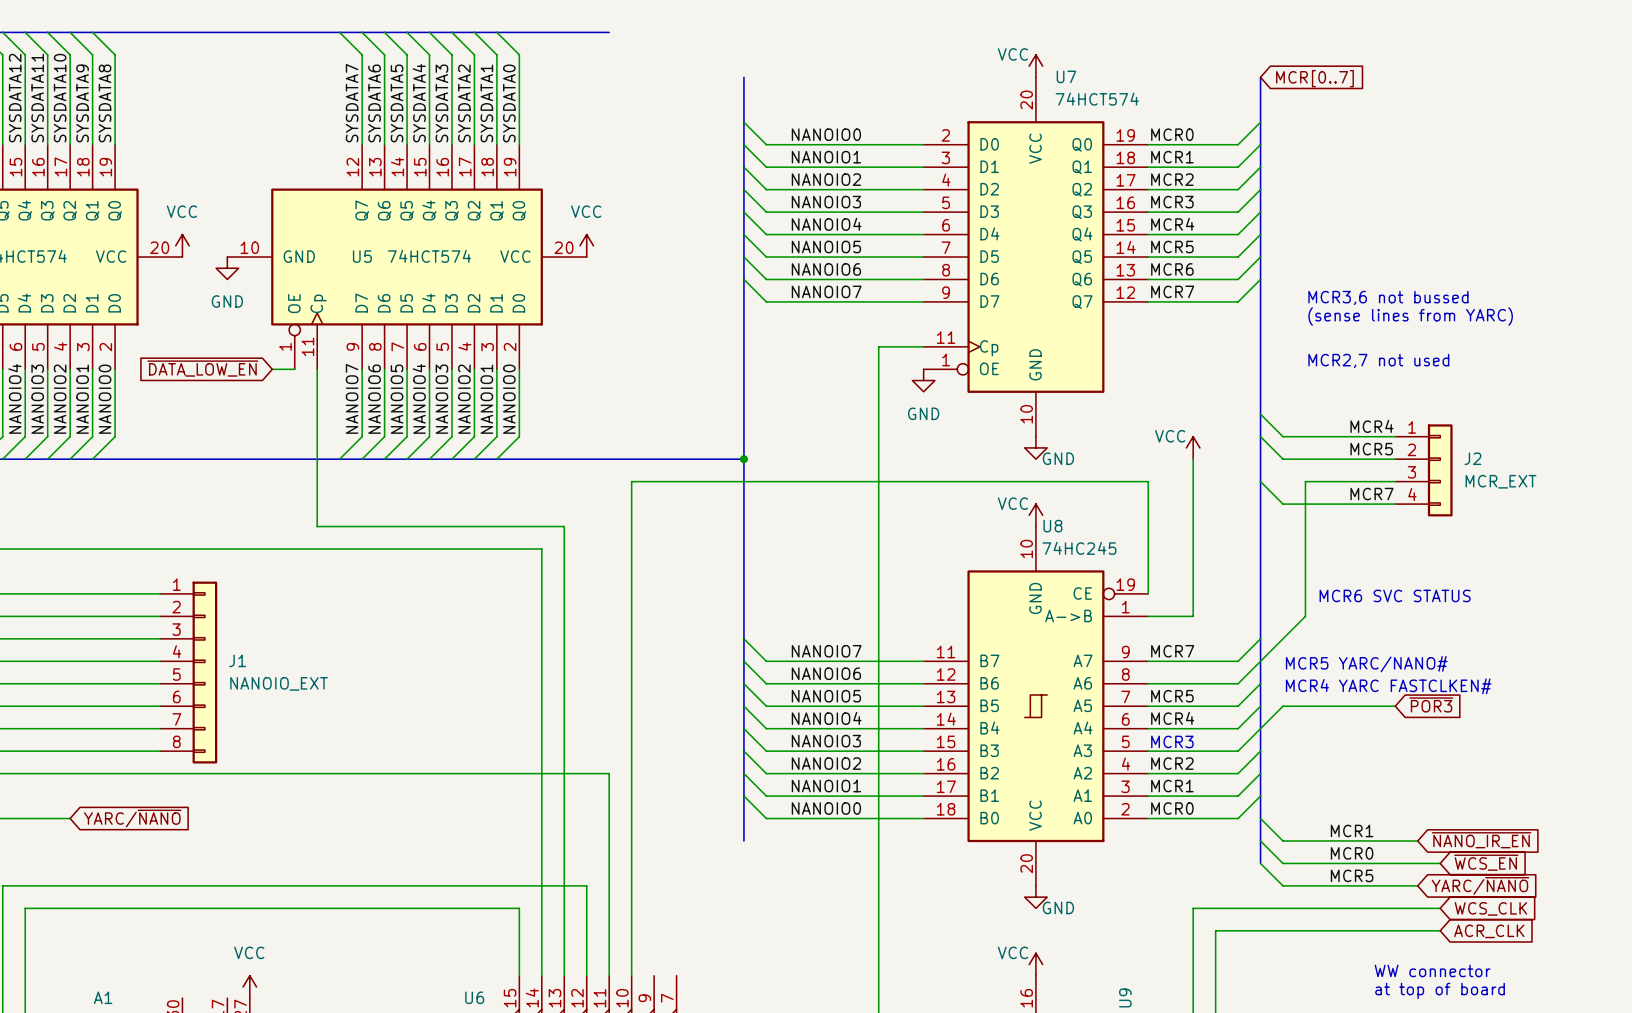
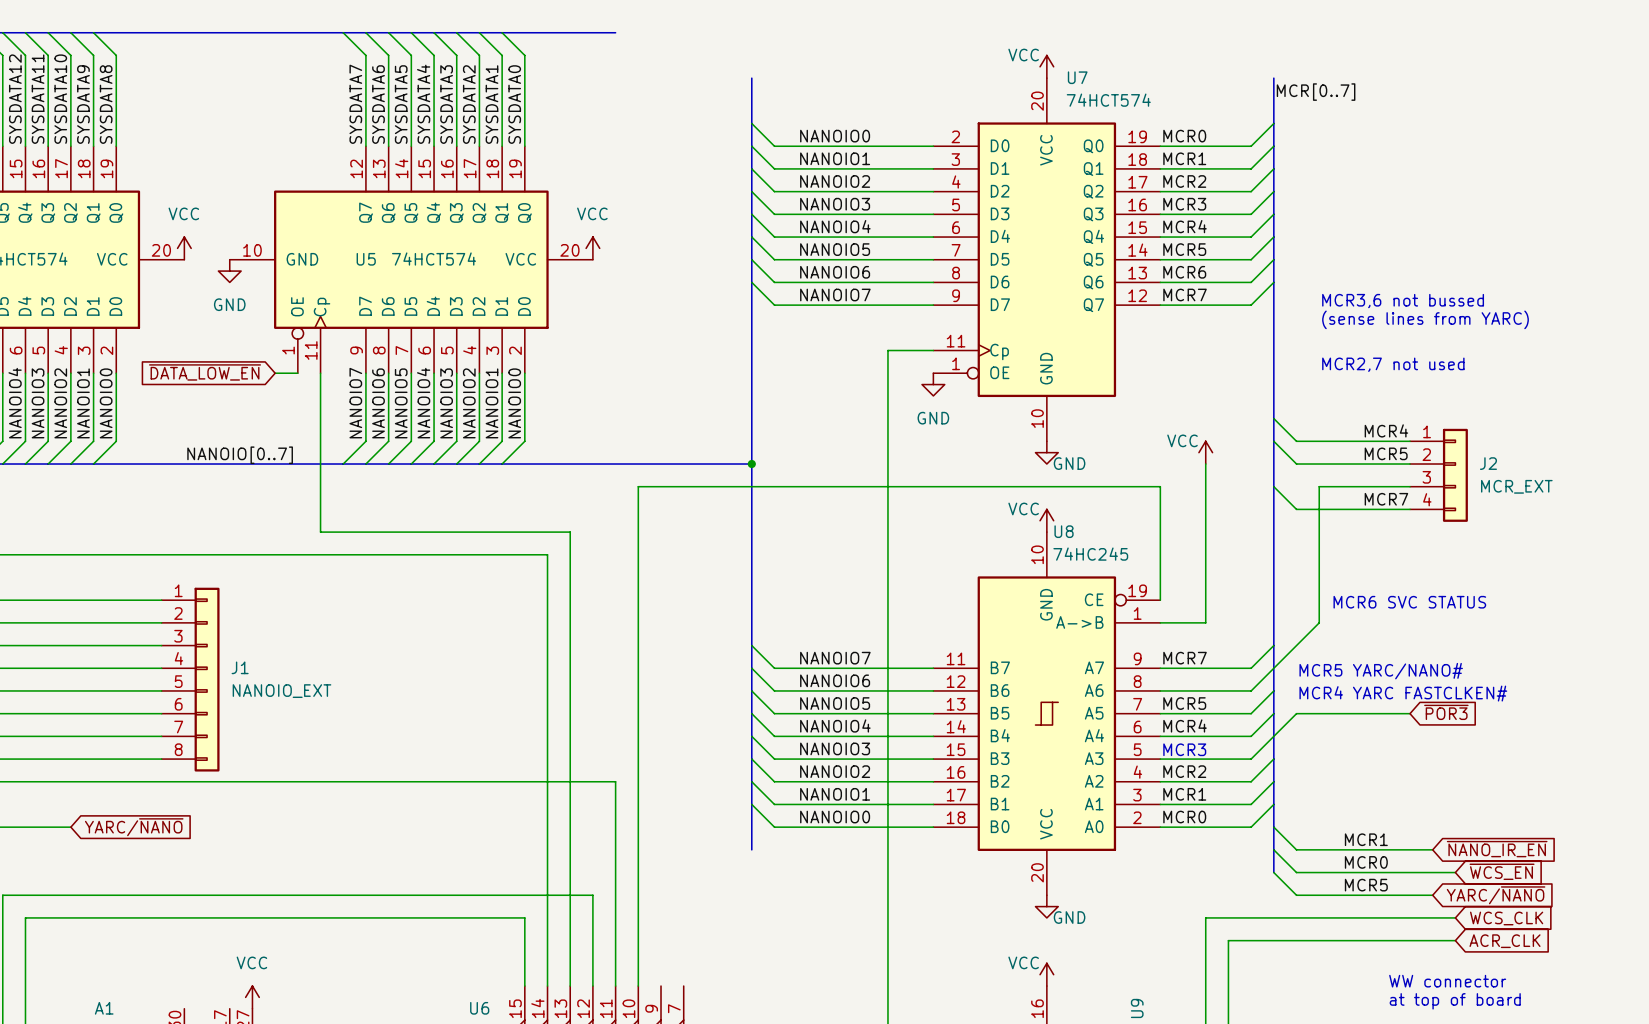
global label: MCR[0..7] (1314, 78) -> none
label: none -> MCR[0..7] (1316, 92)
label: none -> NANOIO[0..7] (240, 455)

